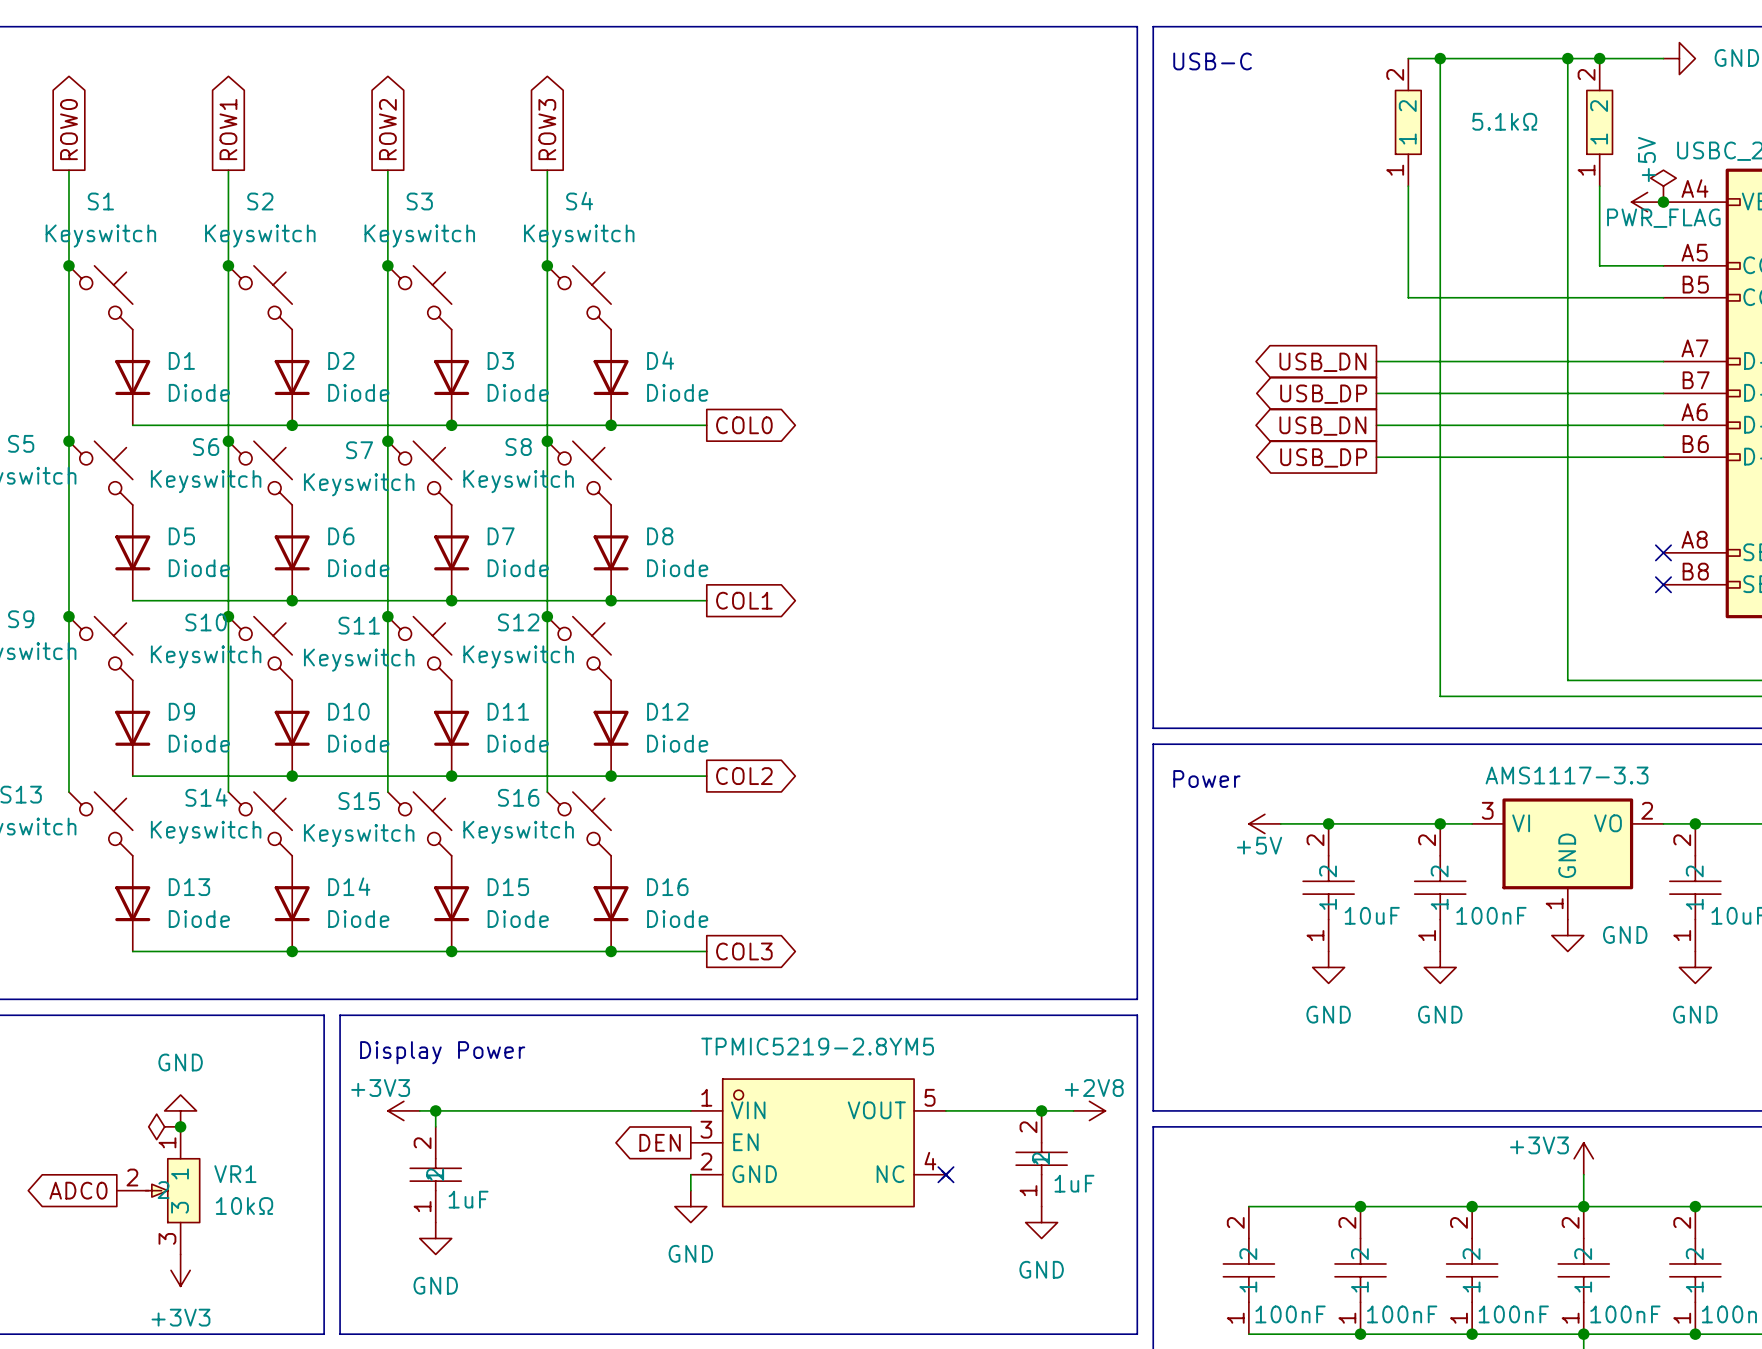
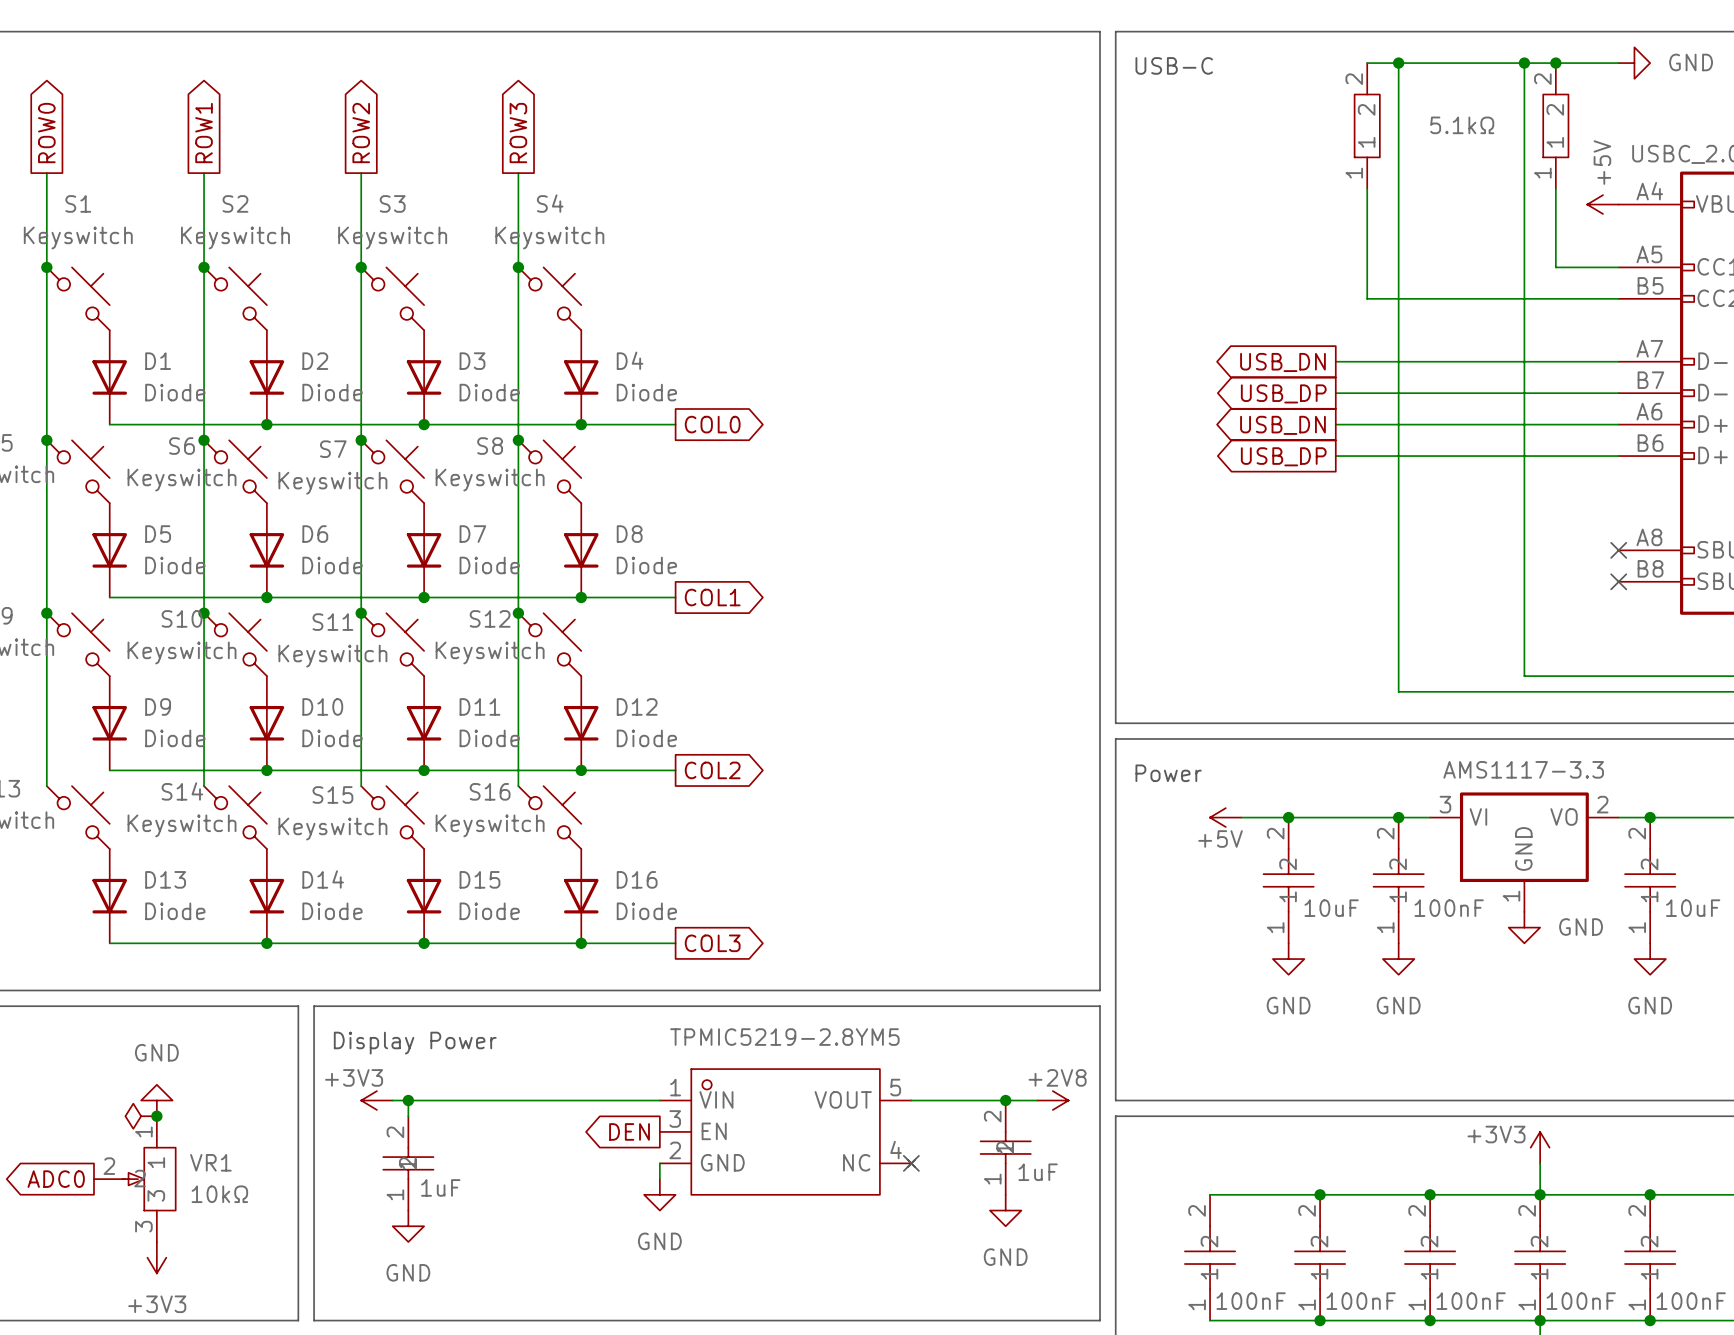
power symbol: PWR_FLAG (1663, 186) -> none
junction: (1663, 202) -> none

